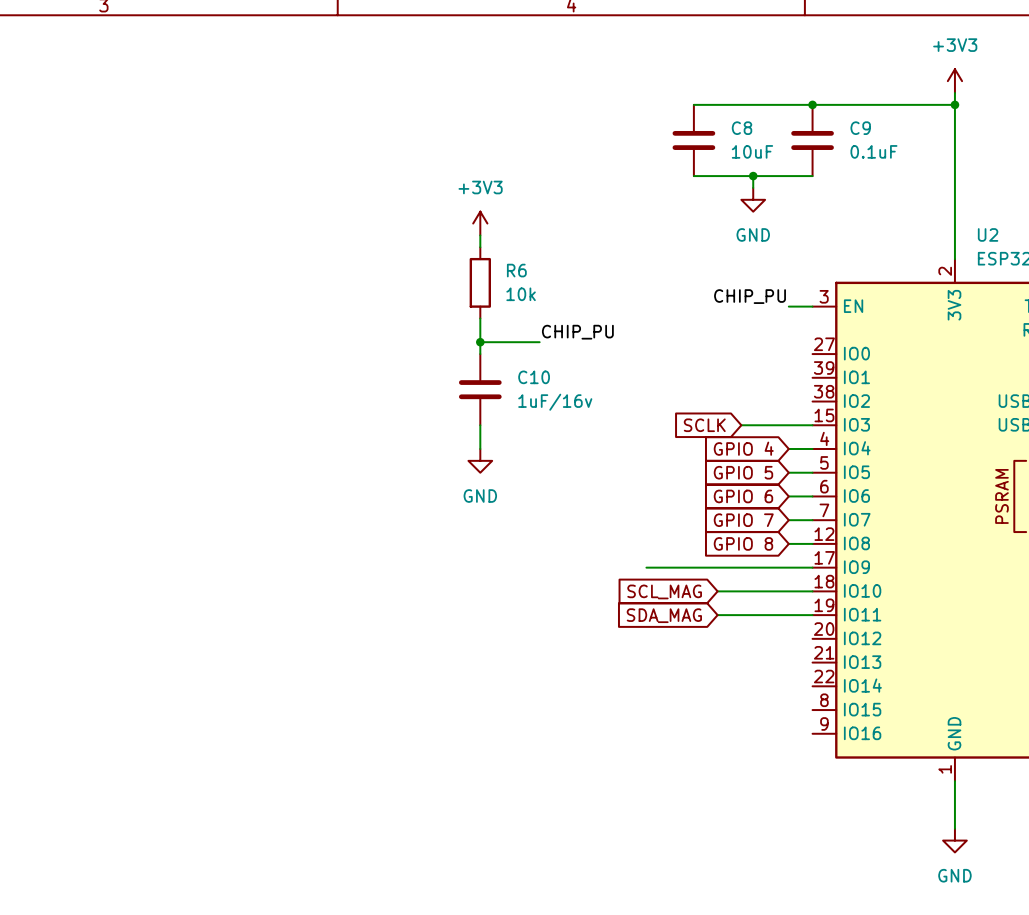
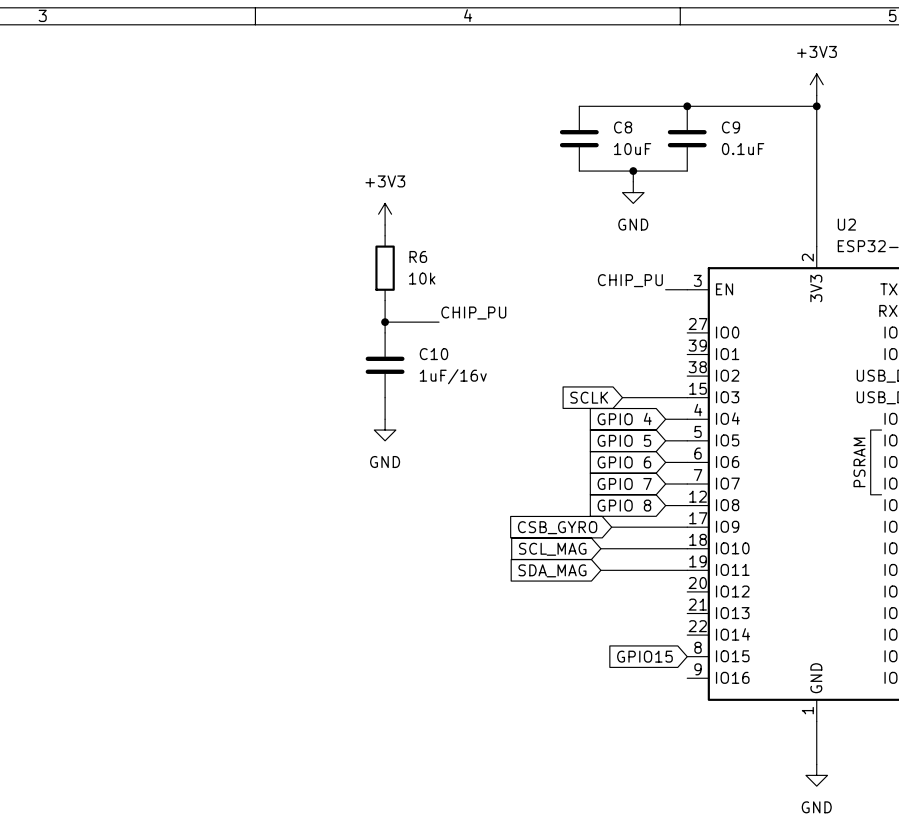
wire: (646, 567) (729, 567) -> none
global label: none -> CSB_GYRO (557, 527)
global label: none -> GPIO15 (644, 656)

